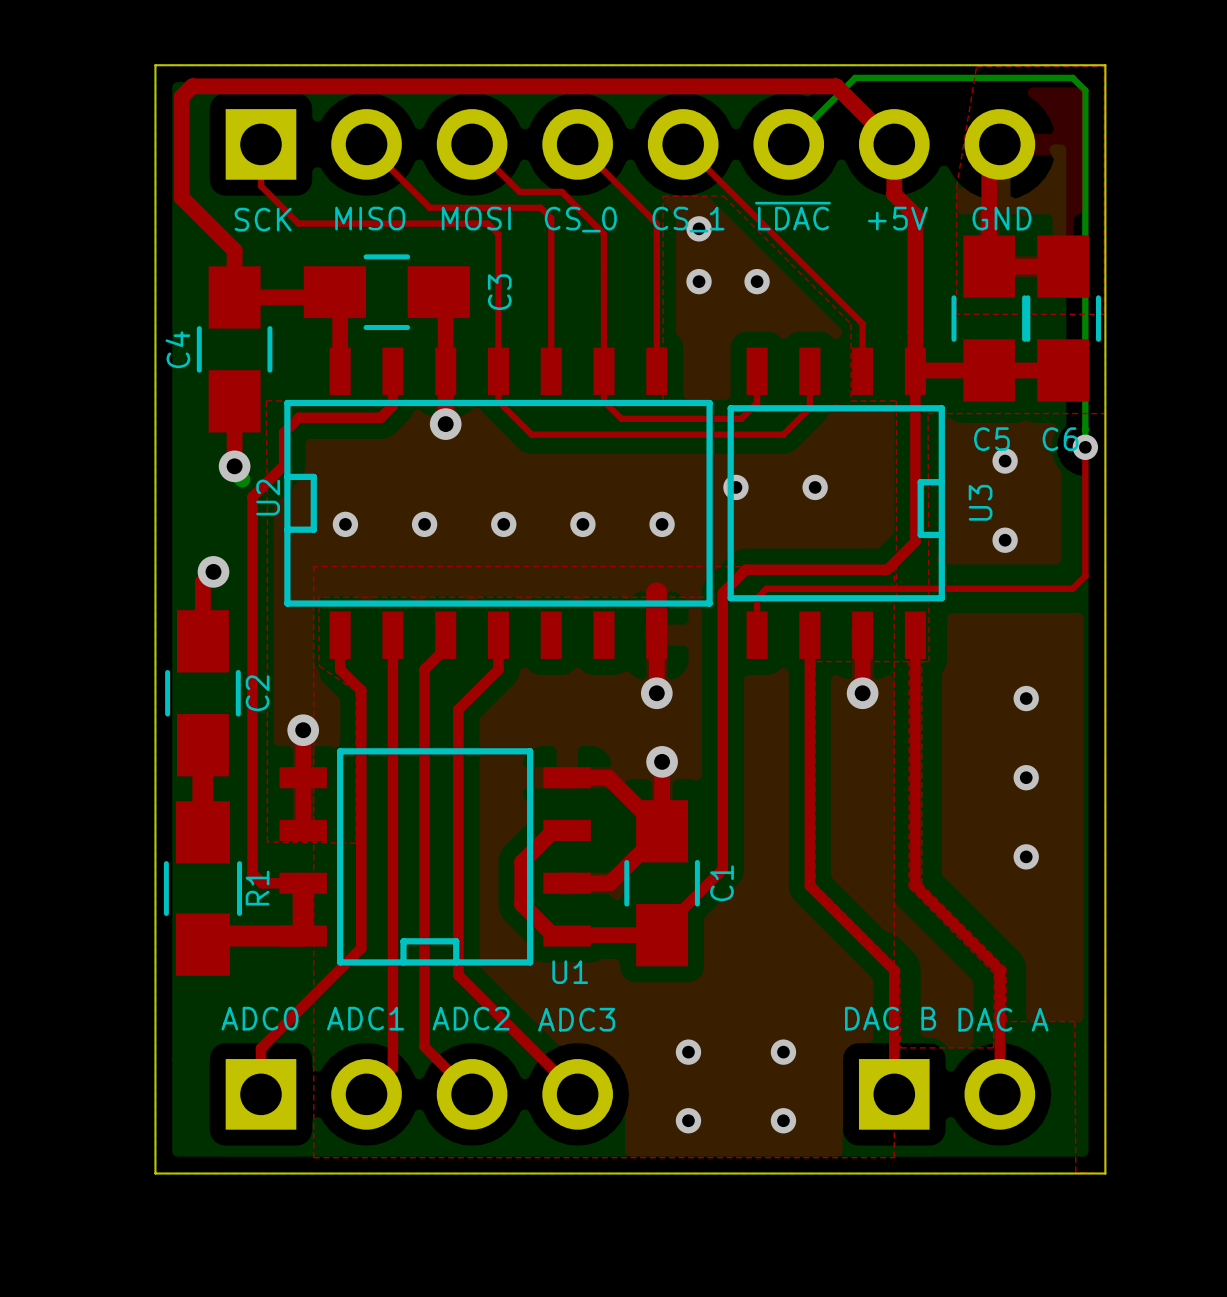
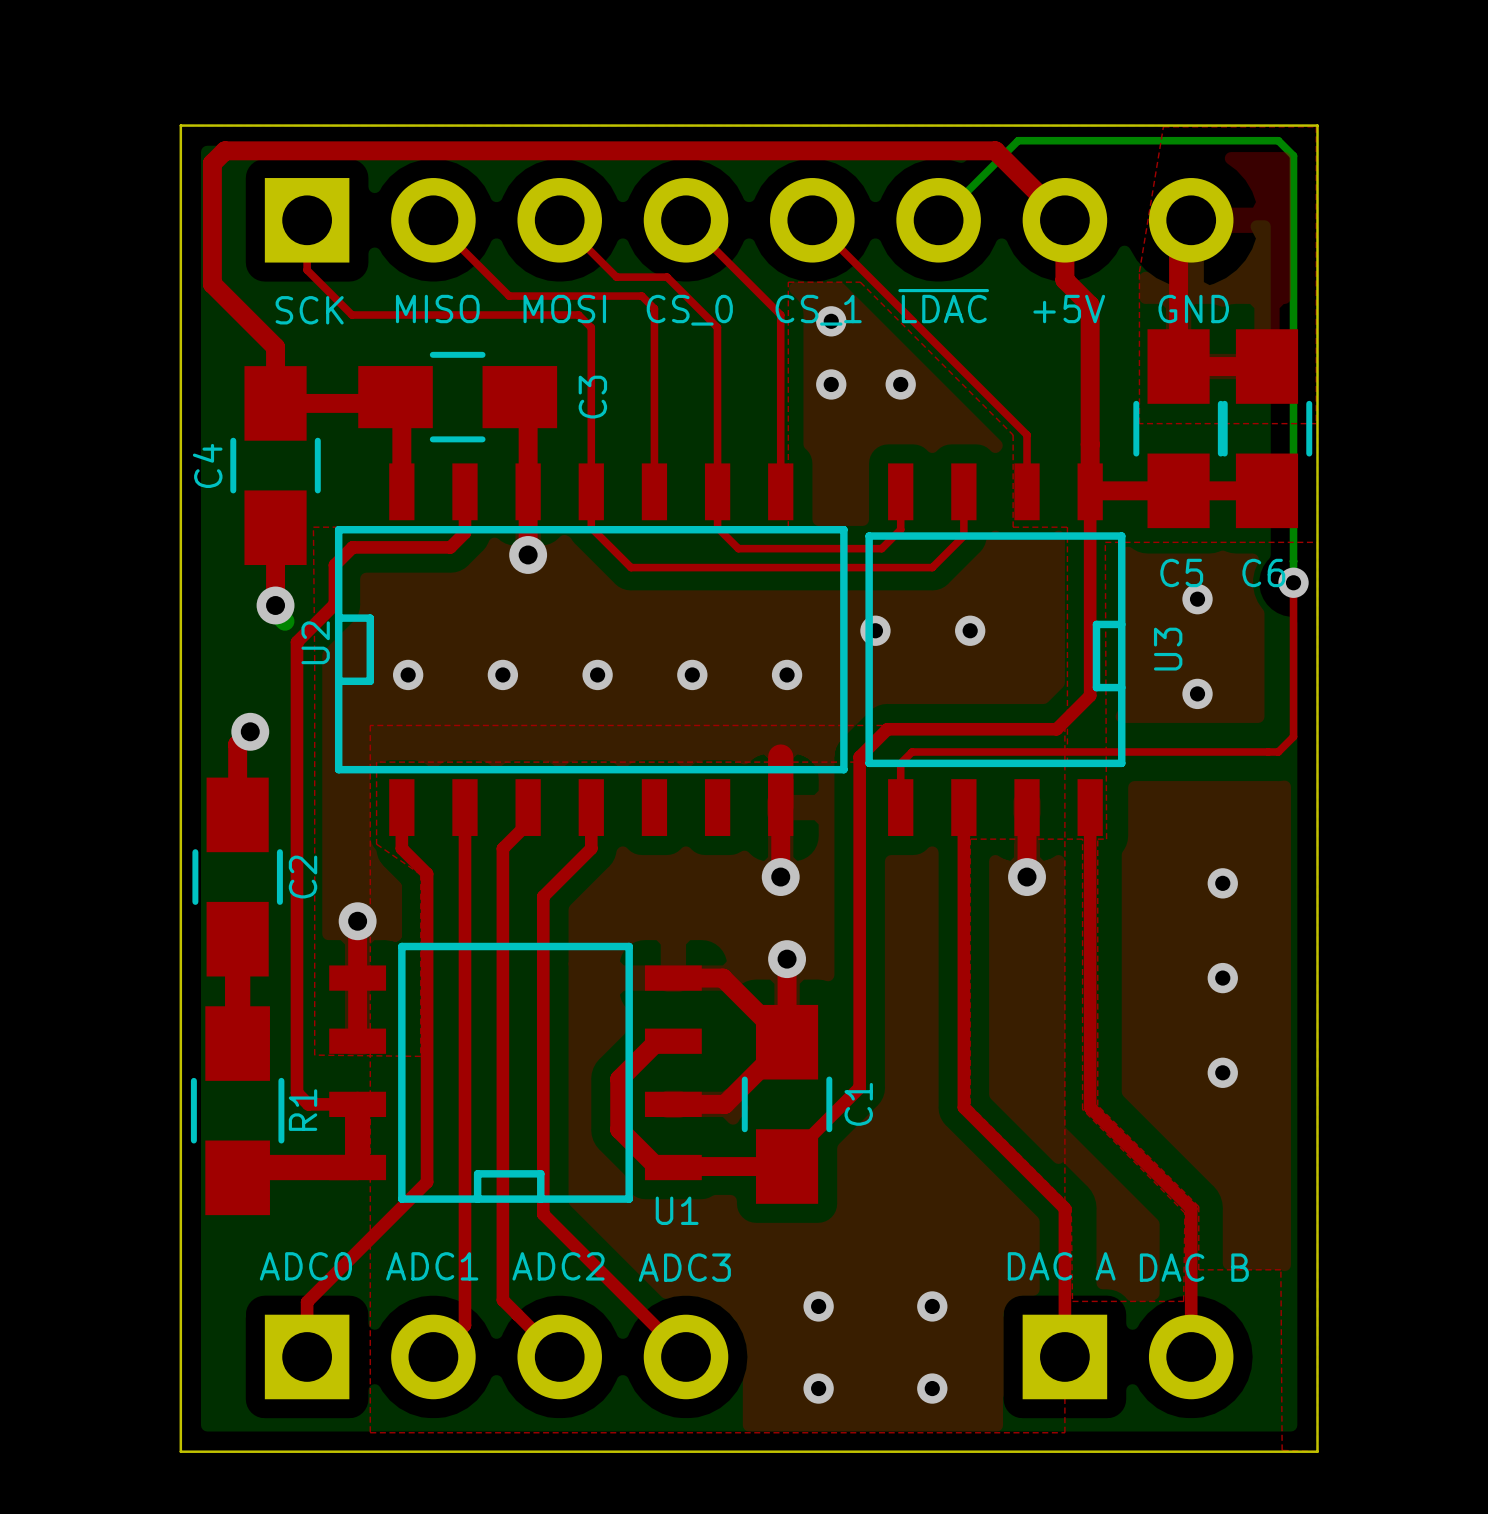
text: DAC B (890, 1018) -> DAC A (1061, 1266)
text: DAC A (1003, 1019) -> DAC B (1194, 1267)

